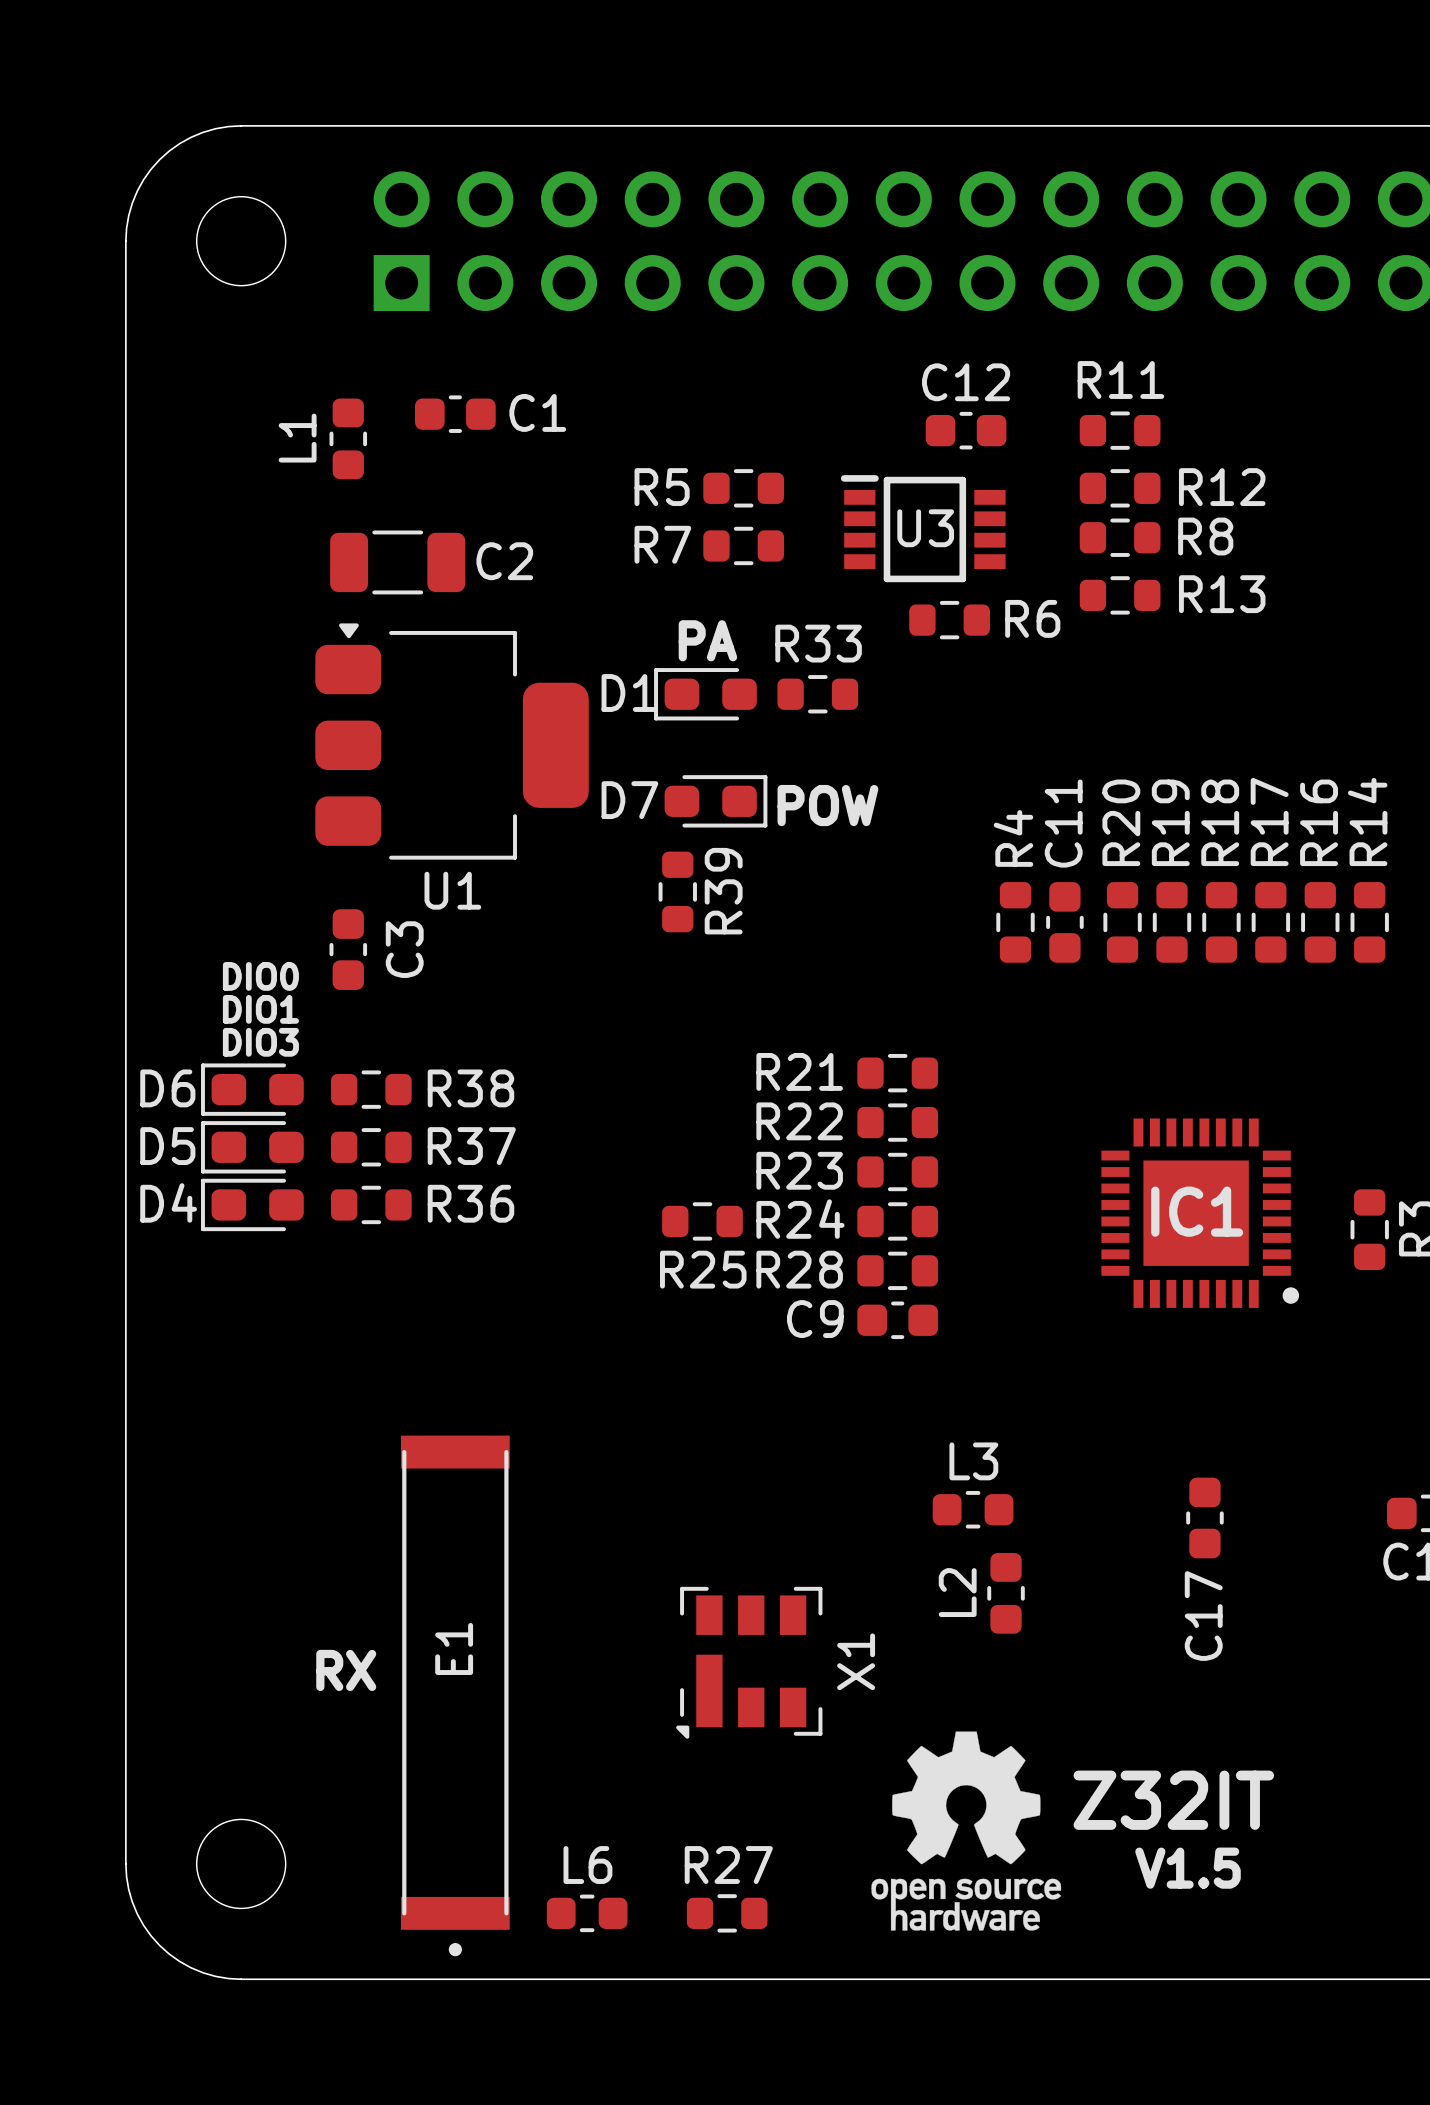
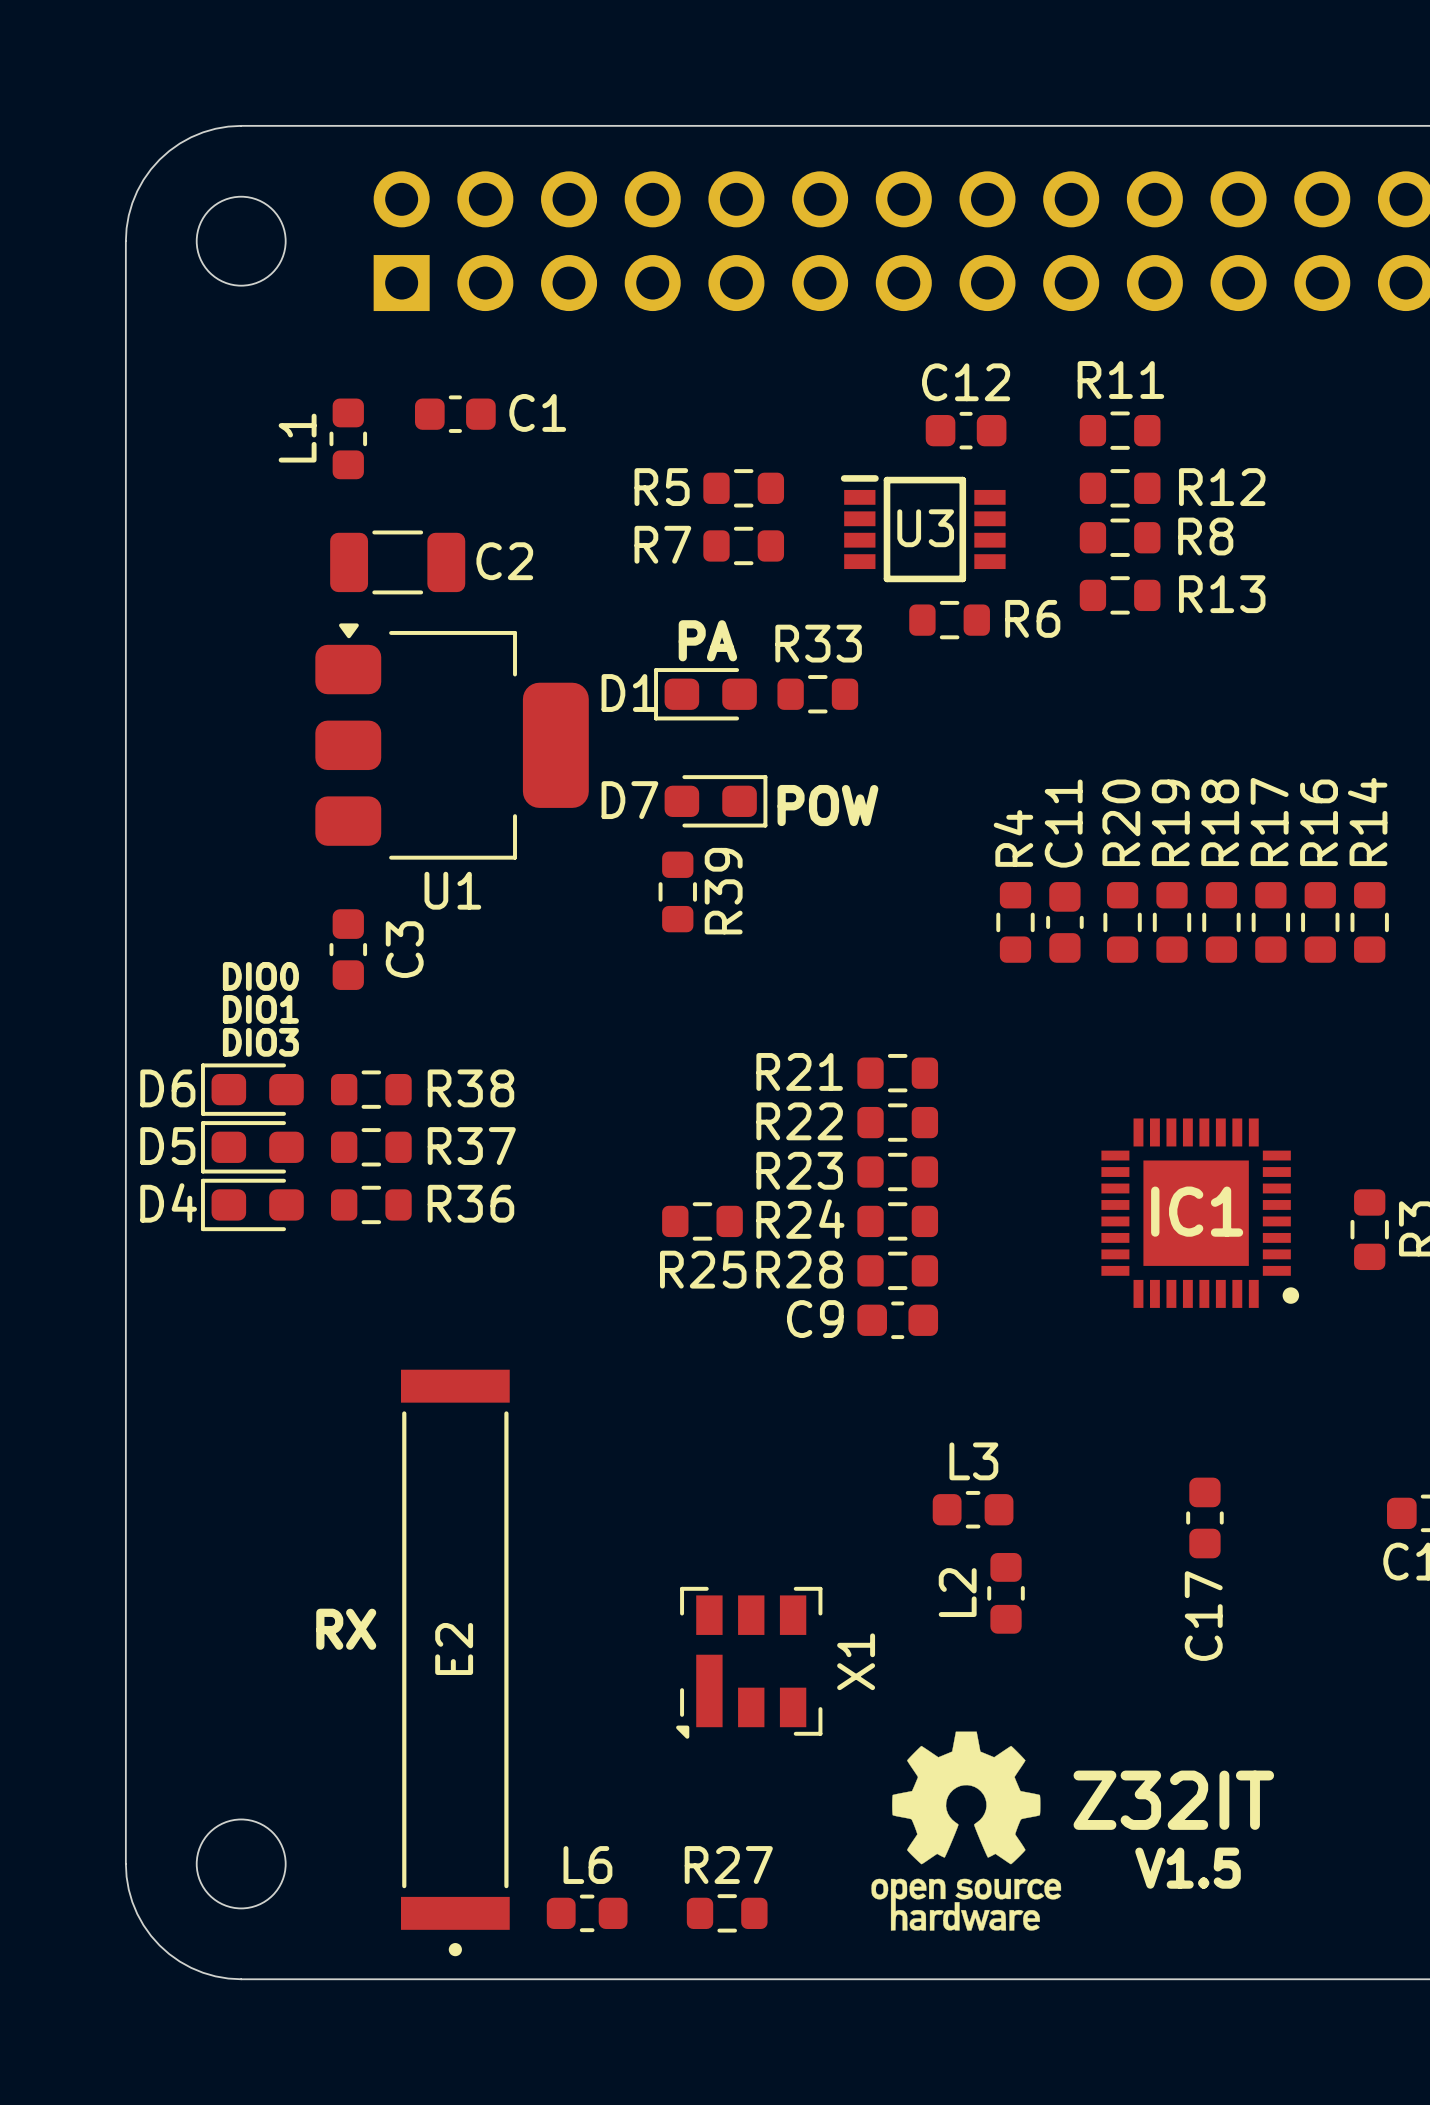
E2: none -> (455, 1662)
text position: RX (346, 1670) -> RX (346, 1629)
E1: (455, 1695) -> none

